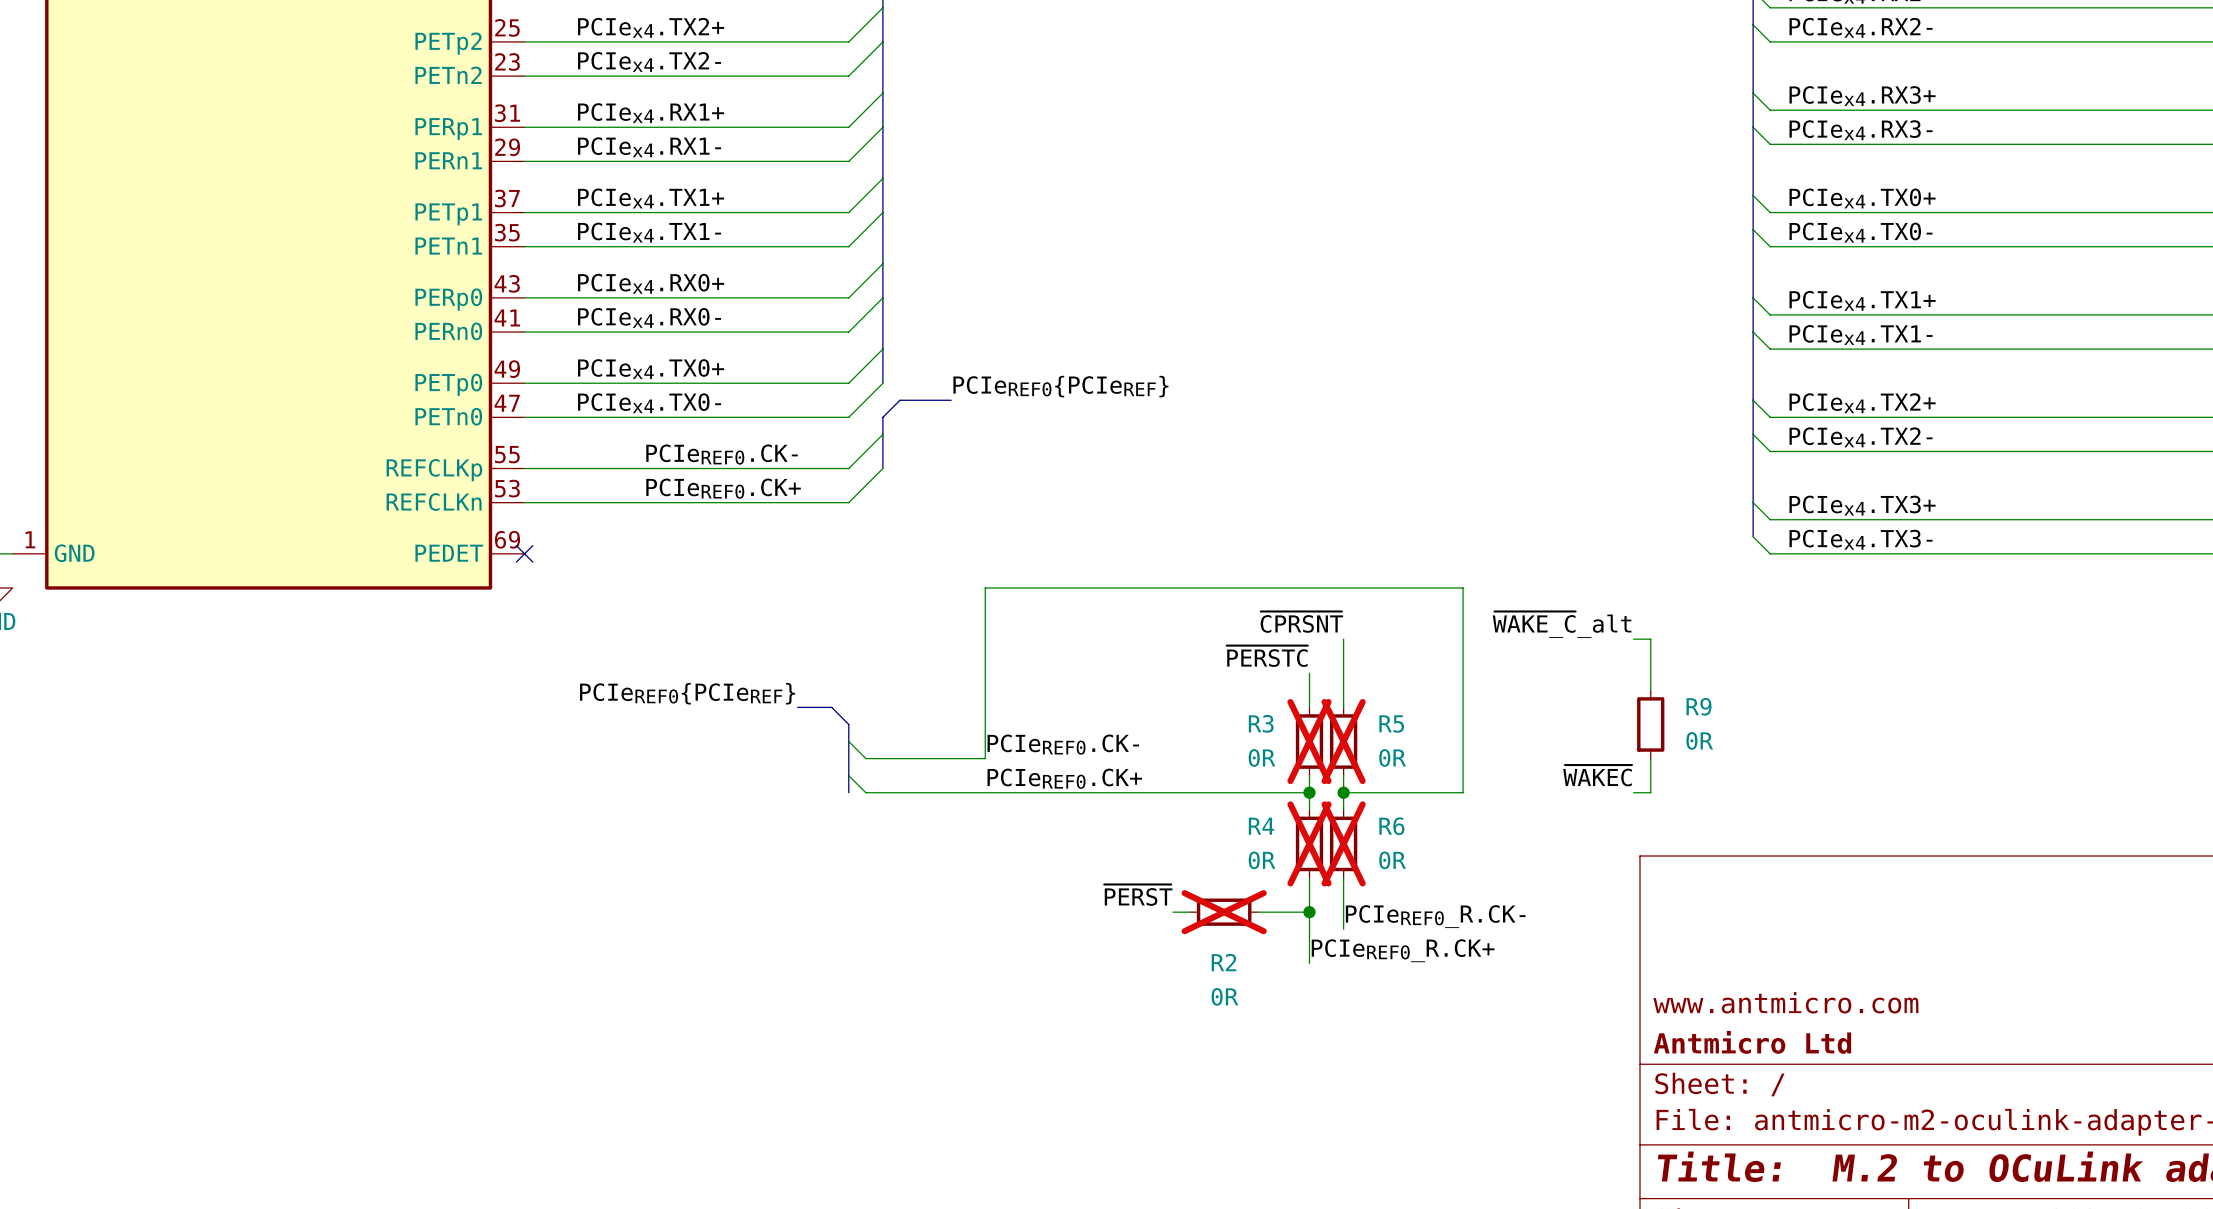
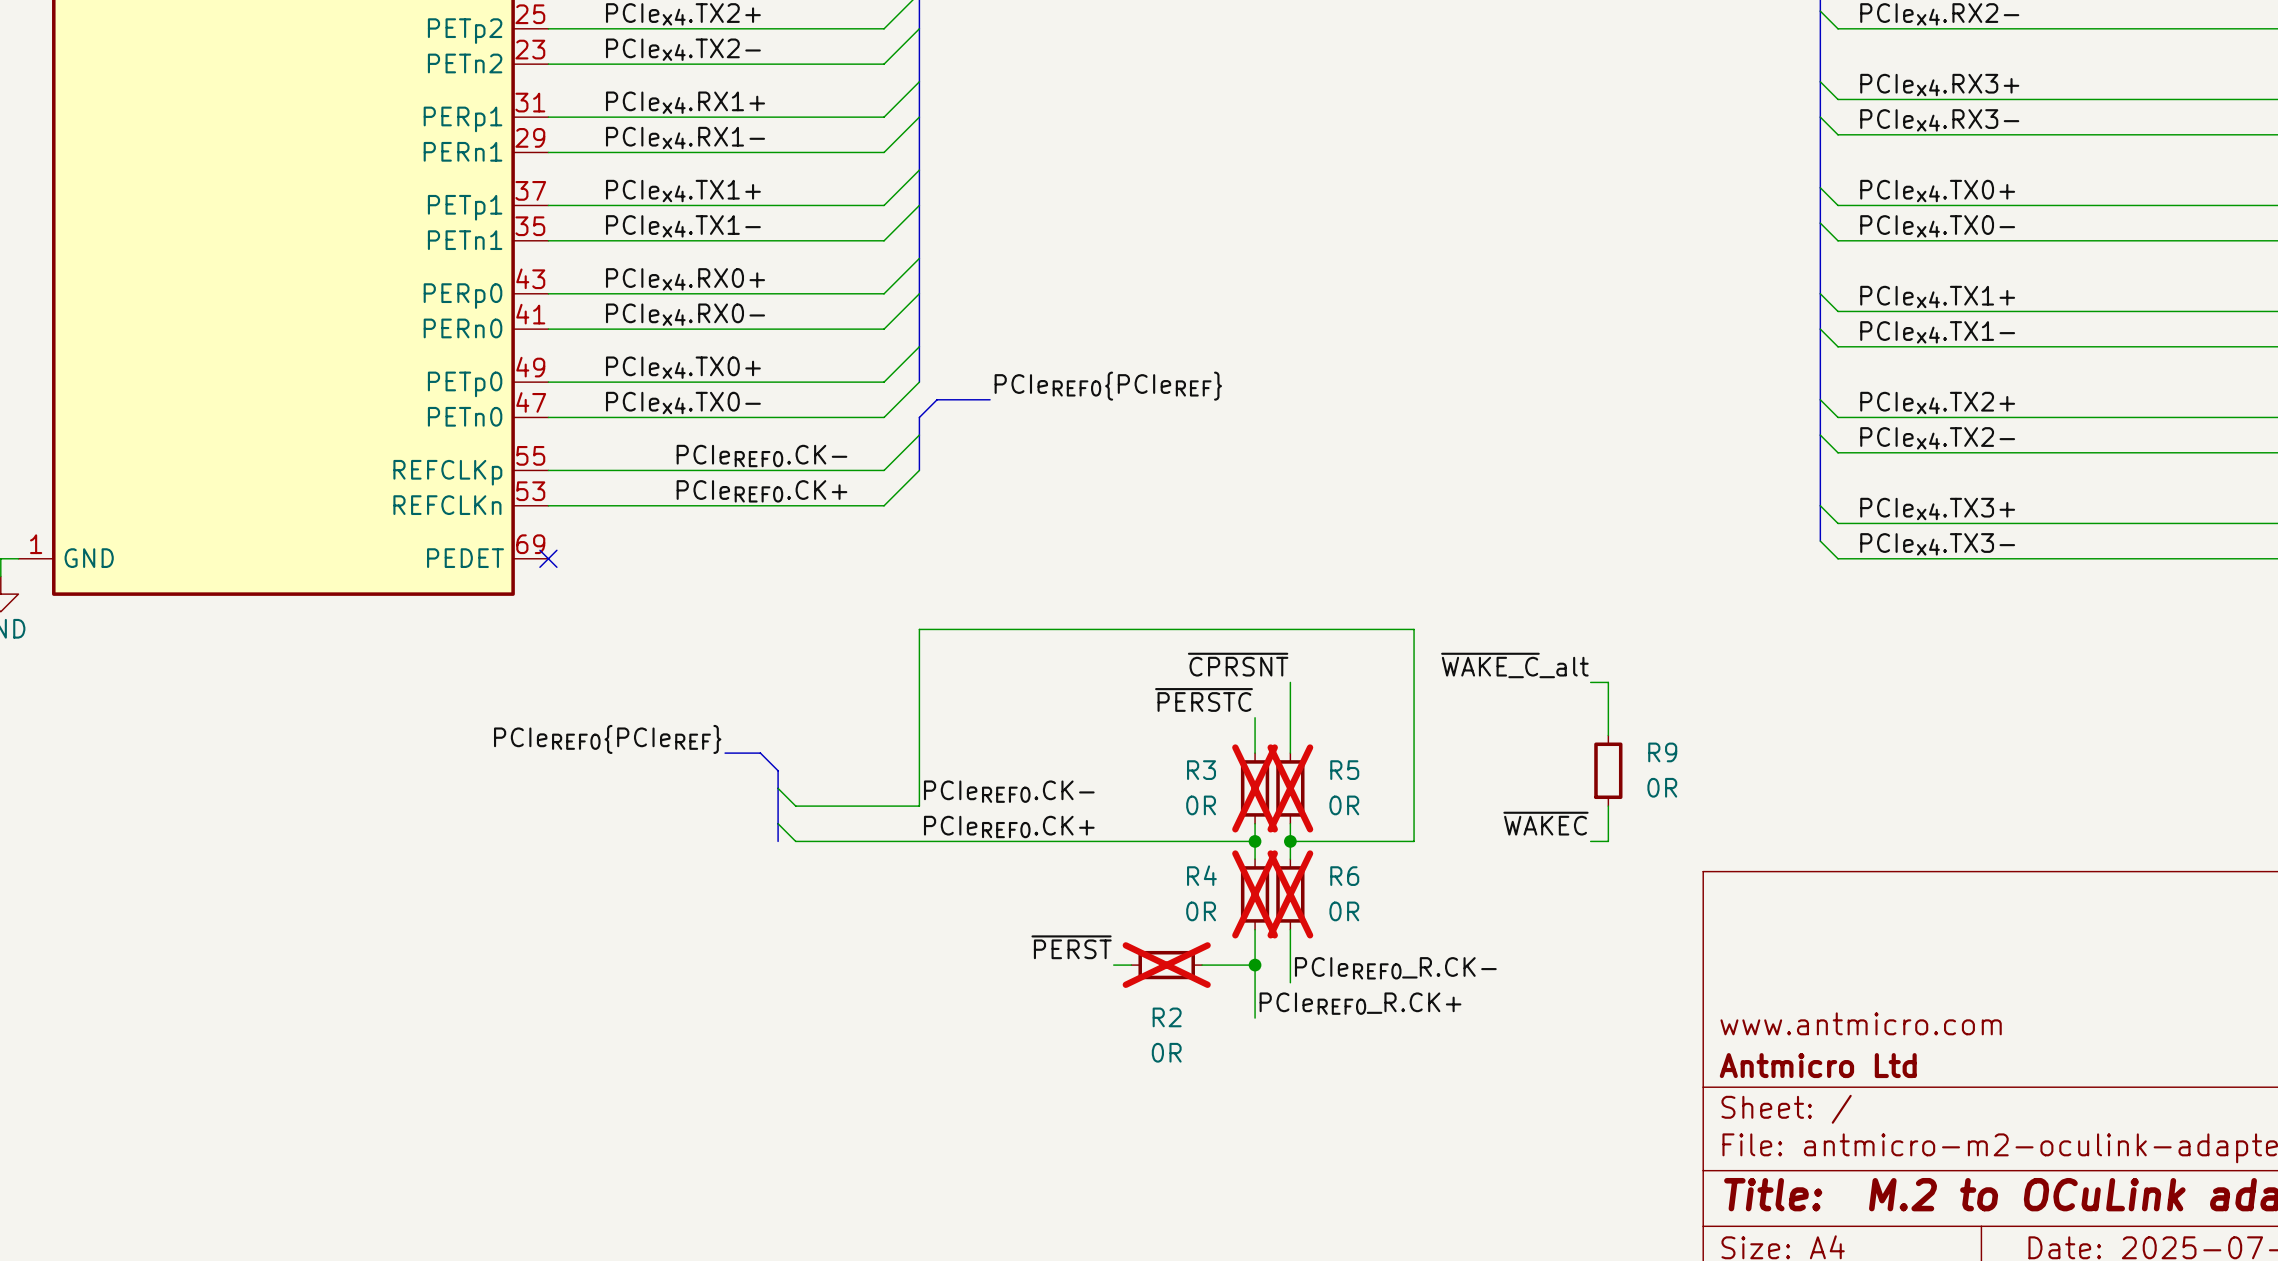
label position: ~{CPRSNT} (1301, 622) -> ~{CPRSNT} (1238, 664)
label position: ~{WAKE_C}_alt (1562, 624) -> ~{WAKE_C}_alt (1514, 665)
wire: (1343, 639) (1343, 707) -> (1290, 682) (1290, 753)
wire: (1633, 639) (1650, 639) (1650, 690) -> (1590, 682) (1608, 682) (1608, 735)
label position: ~{PERSTC} (1267, 656) -> ~{PERSTC} (1204, 699)
wire: (1309, 673) (1309, 707) -> (1255, 717) (1255, 753)
label position: PCIeREF0{PCIeREF} (687, 693) -> PCIeREF0{PCIeREF} (607, 739)
bus: (797, 707) (831, 707) (848, 724) (848, 792) -> (725, 753) (760, 753) (778, 770) (778, 841)
R9 position: (1650, 724) -> (1608, 770)
wire: (848, 741) (865, 758) (985, 758) (985, 587) (1463, 587) (1463, 792) (1343, 792) -> none
R3 position: (1309, 741) -> (1255, 788)
R5 position: (1343, 741) -> (1290, 788)
label position: PCIeREF0.CK- (1063, 744) -> PCIeREF0.CK- (1009, 791)
wire: (1650, 758) (1650, 792) (1633, 792) -> (1608, 806) (1608, 841) (1590, 841)
wire: (848, 775) (865, 792) -> (778, 788) (795, 806) (901, 806)
wire: (1309, 775) (1309, 809) -> (1255, 823) (1255, 859)
wire: (1343, 775) (1343, 809) -> (1290, 823) (1290, 859)
label position: ~{WAKEC} (1597, 775) -> ~{WAKEC} (1545, 823)
label position: PCIeREF0.CK+ (1064, 778) -> PCIeREF0.CK+ (1009, 826)
wire: (882, 792) (1309, 792) -> (919, 806) (919, 629) (1414, 629) (1414, 841) (1290, 841)
junction: (1309, 792) -> none
junction: (1343, 792) -> none
wire: none -> (778, 823) (795, 841) (1255, 841)
junction: none -> (1255, 841)
junction: none -> (1290, 841)
R4 position: (1309, 843) -> (1255, 894)
R6 position: (1343, 843) -> (1290, 894)
wire: (1309, 878) (1309, 963) -> (1255, 929) (1255, 1018)
wire: (1343, 878) (1343, 929) -> (1290, 929) (1290, 982)
label position: ~{PERST} (1138, 895) -> ~{PERST} (1071, 947)
wire: (1172, 912) (1190, 912) -> (1113, 965) (1131, 965)
R2 position: (1224, 912) -> (1166, 965)
wire: (1258, 912) (1309, 912) -> (1202, 965) (1255, 965)
junction: (1309, 912) -> none
label position: PCIeREF0_R.CK- (1435, 916) -> PCIeREF0_R.CK- (1395, 968)
junction: none -> (1255, 965)
label position: PCIeREF0_R.CK+ (1403, 950) -> PCIeREF0_R.CK+ (1360, 1003)

